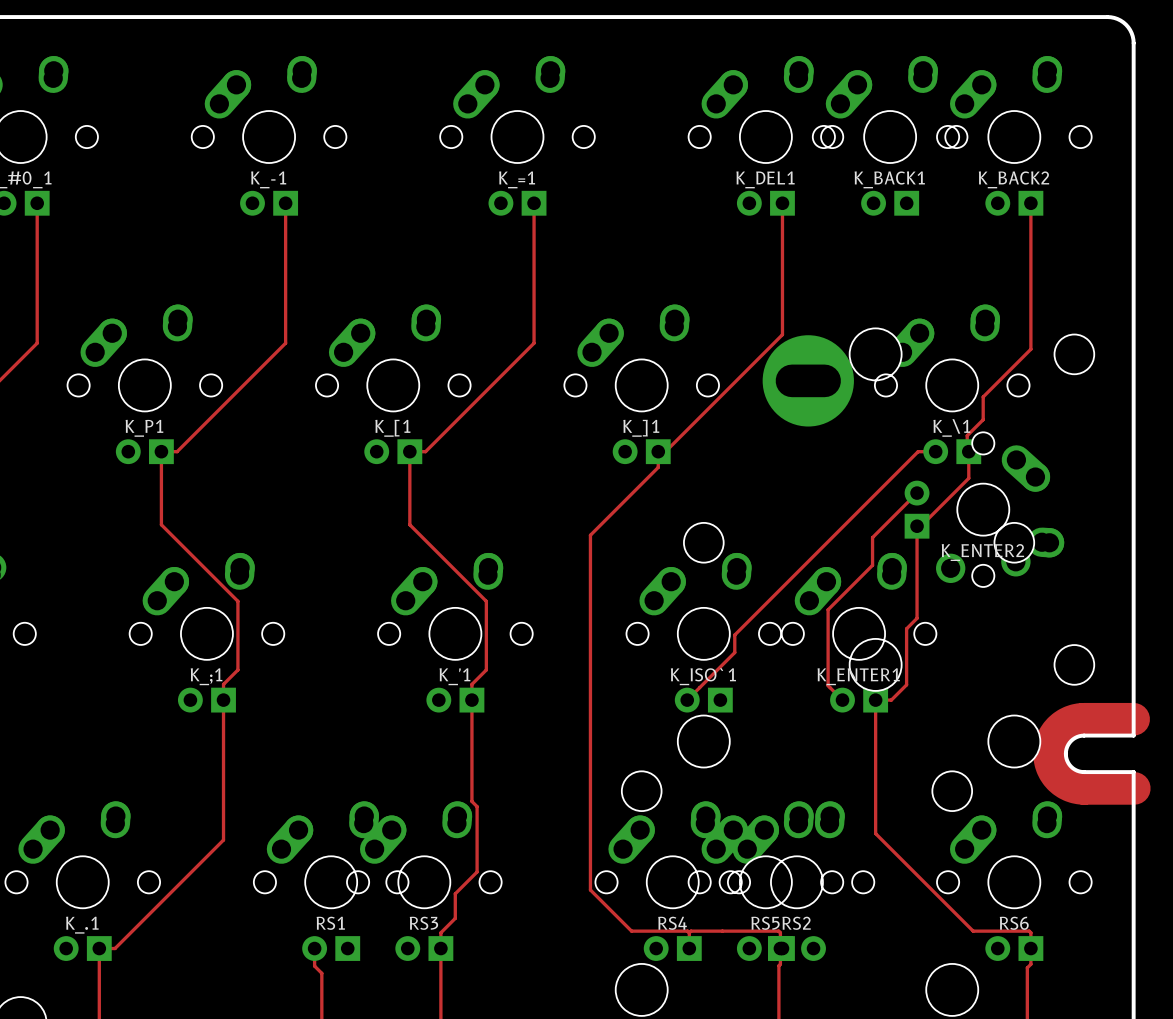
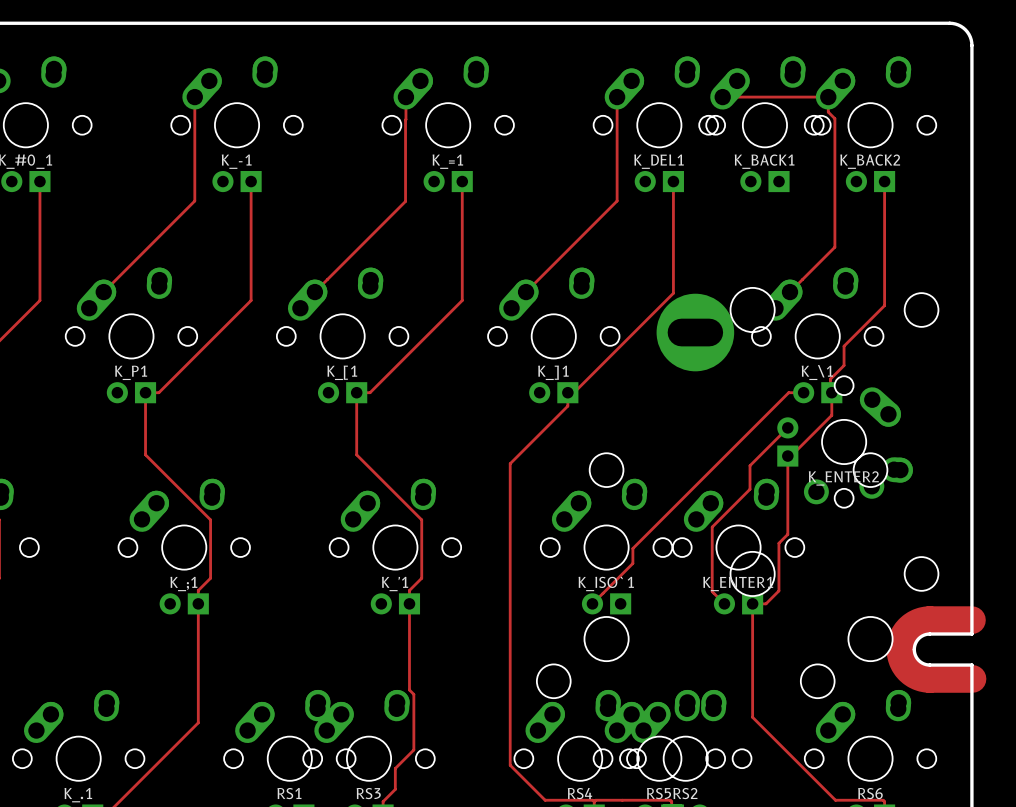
track: none -> (194, 97) (194, 201) (89, 308)
track: none -> (405, 97) (405, 201) (314, 292)
track: none -> (617, 97) (617, 201) (526, 292)
track: none -> (722, 97) (828, 97) (828, 112) (834, 118) (834, 247) (790, 292)

